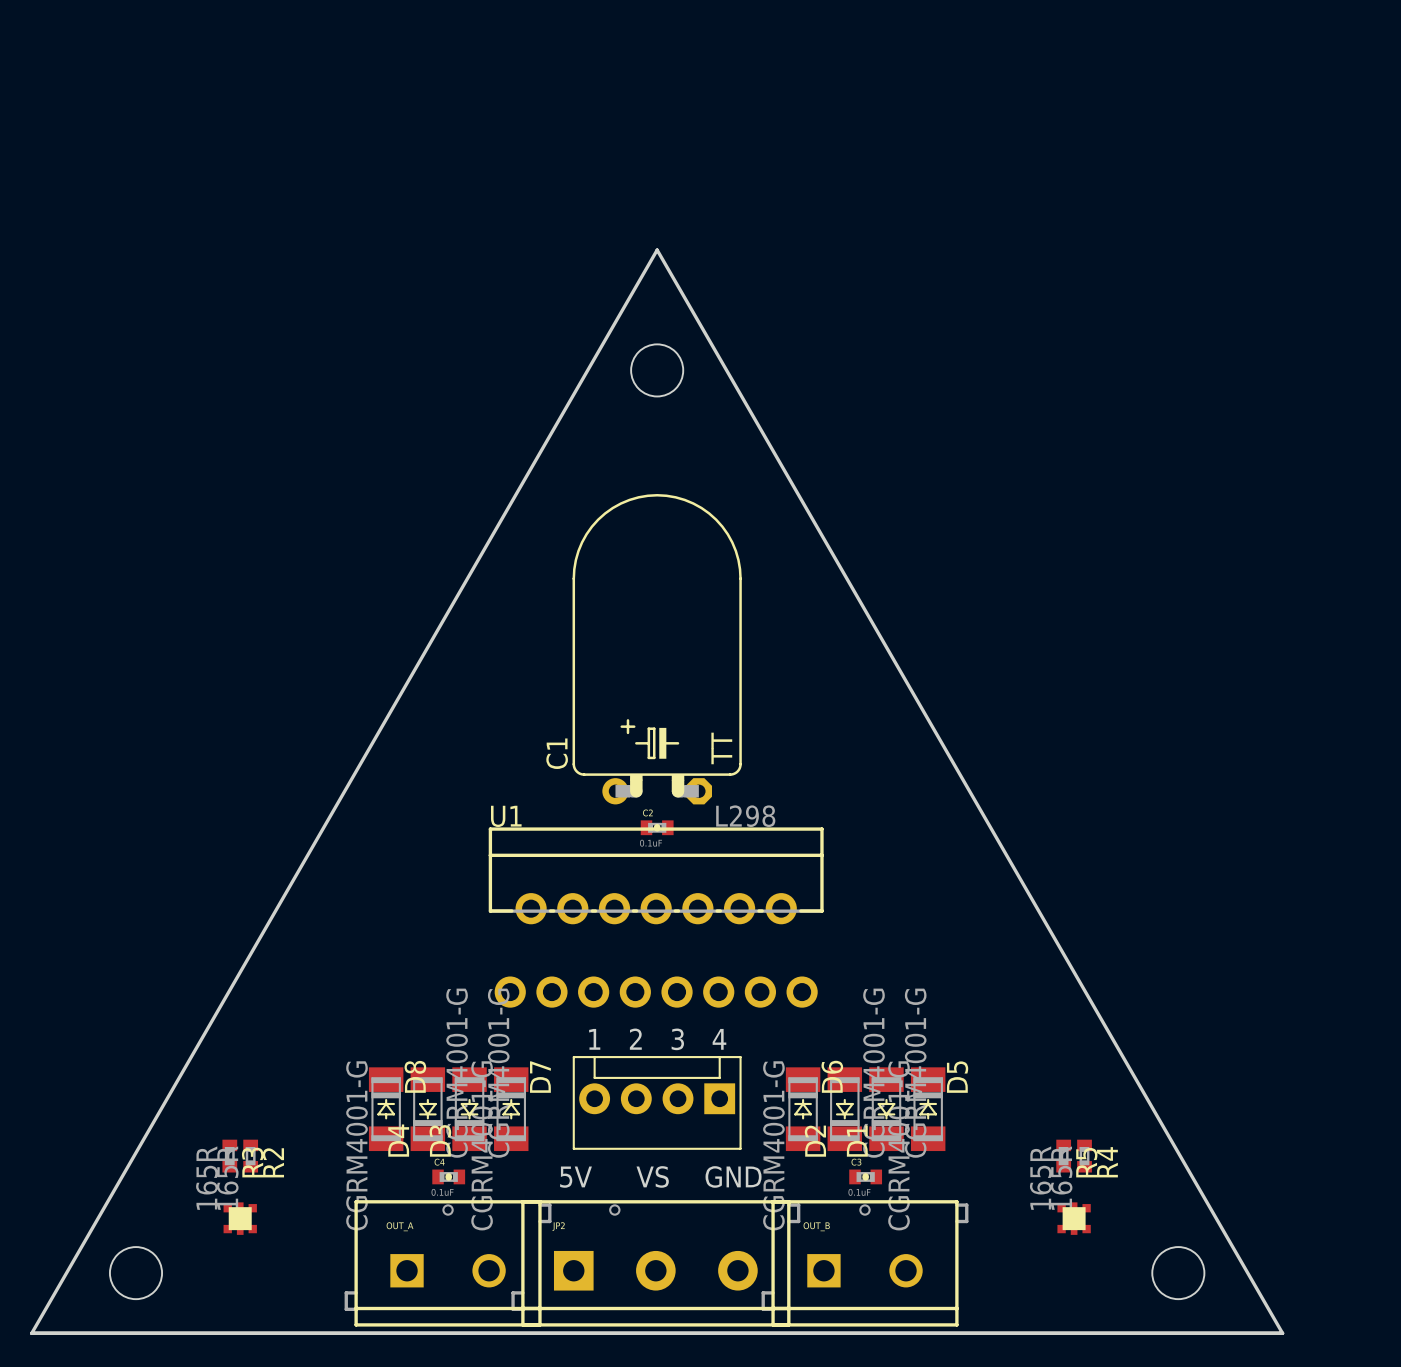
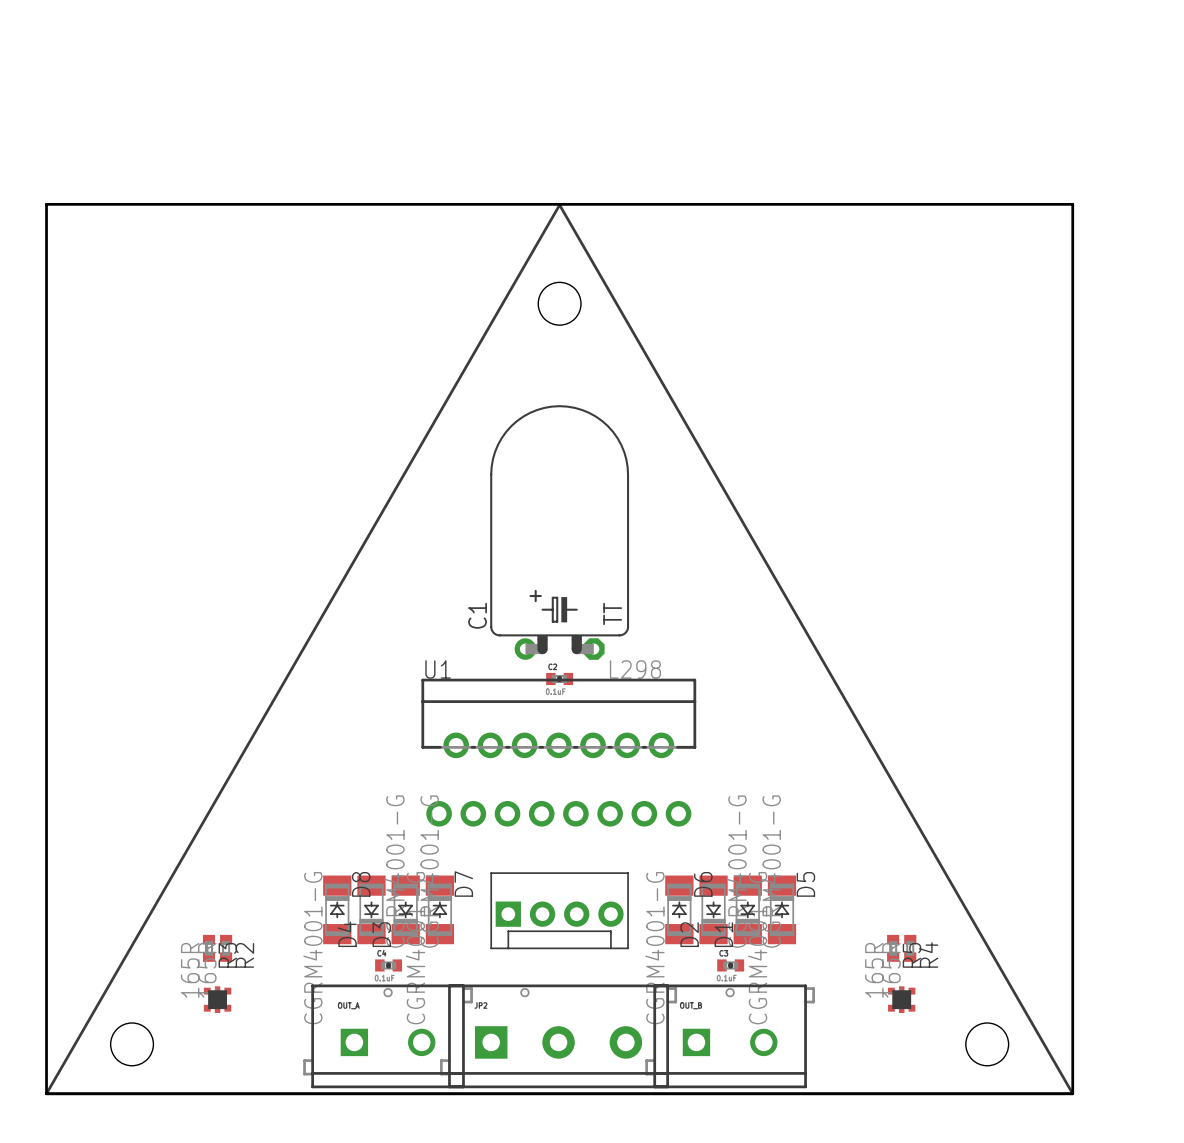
line: none -> (559, 205) (46, 1093) (1072, 1093) (559, 205)
text: 1 (594, 1039) -> none
text: 2 (635, 1039) -> none
text: 3 (677, 1039) -> none
text: 4 (719, 1039) -> none
part rotation: 0° (657, 1102) -> 180° (559, 910)
text: VS (652, 1176) -> none
text: GND (733, 1176) -> none
text: 5V (576, 1177) -> none
board edge: (31, 1333) (657, 250) (1282, 1333) -> (46, 1093) (46, 204) (1072, 204) (1072, 1093)

